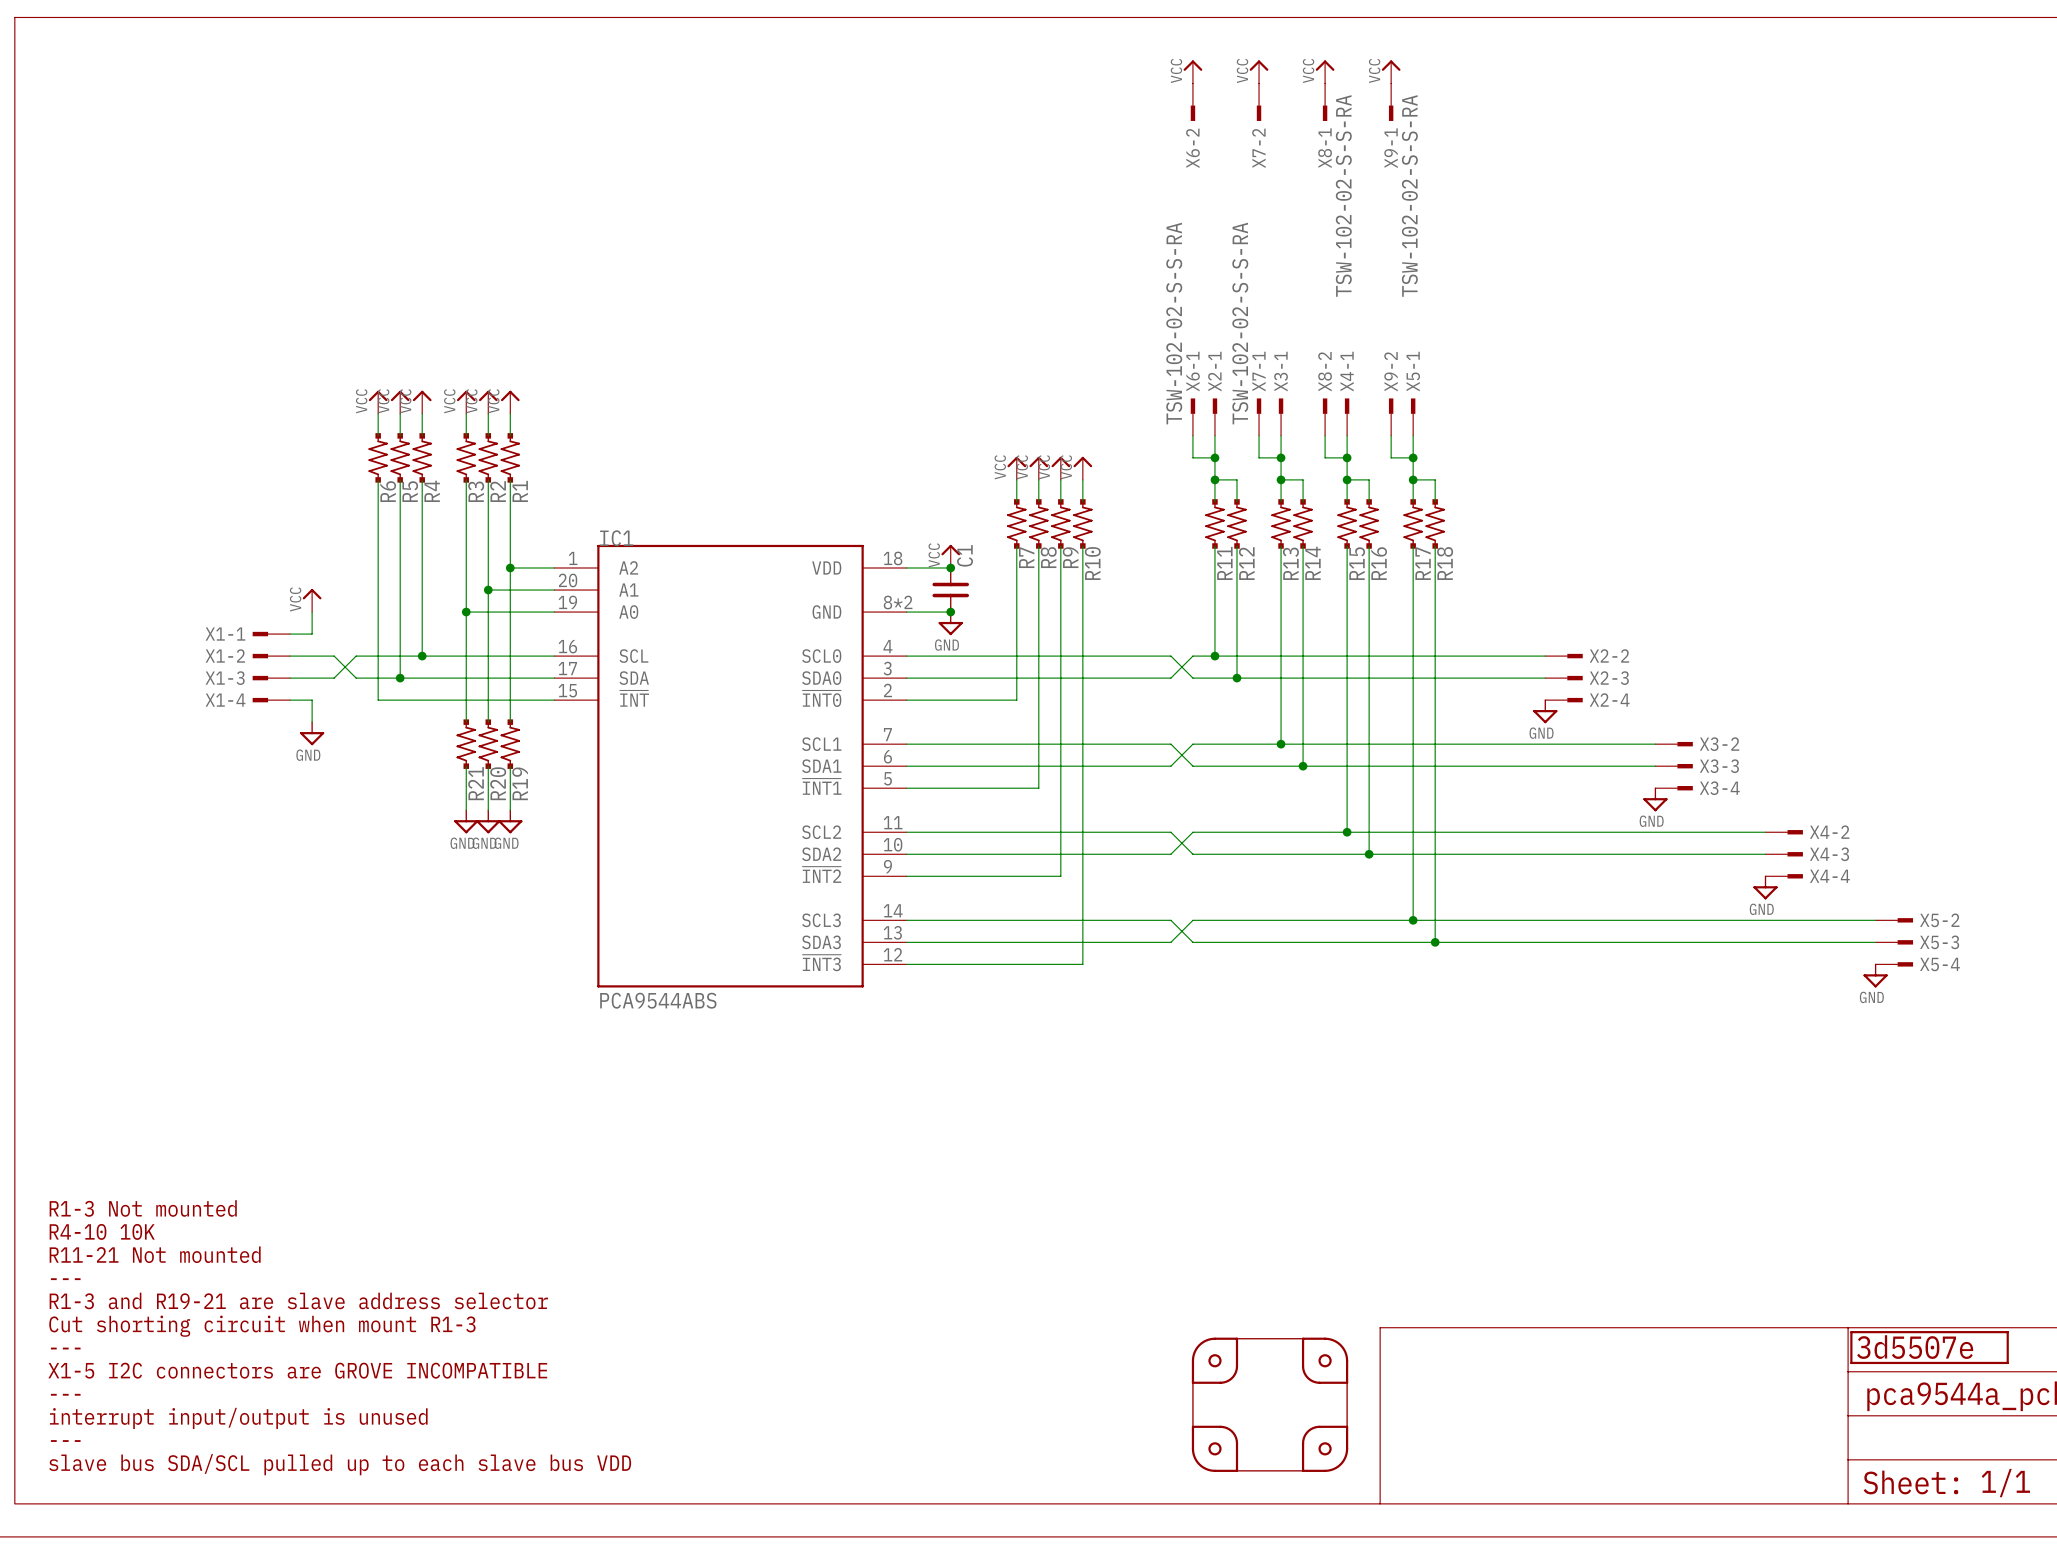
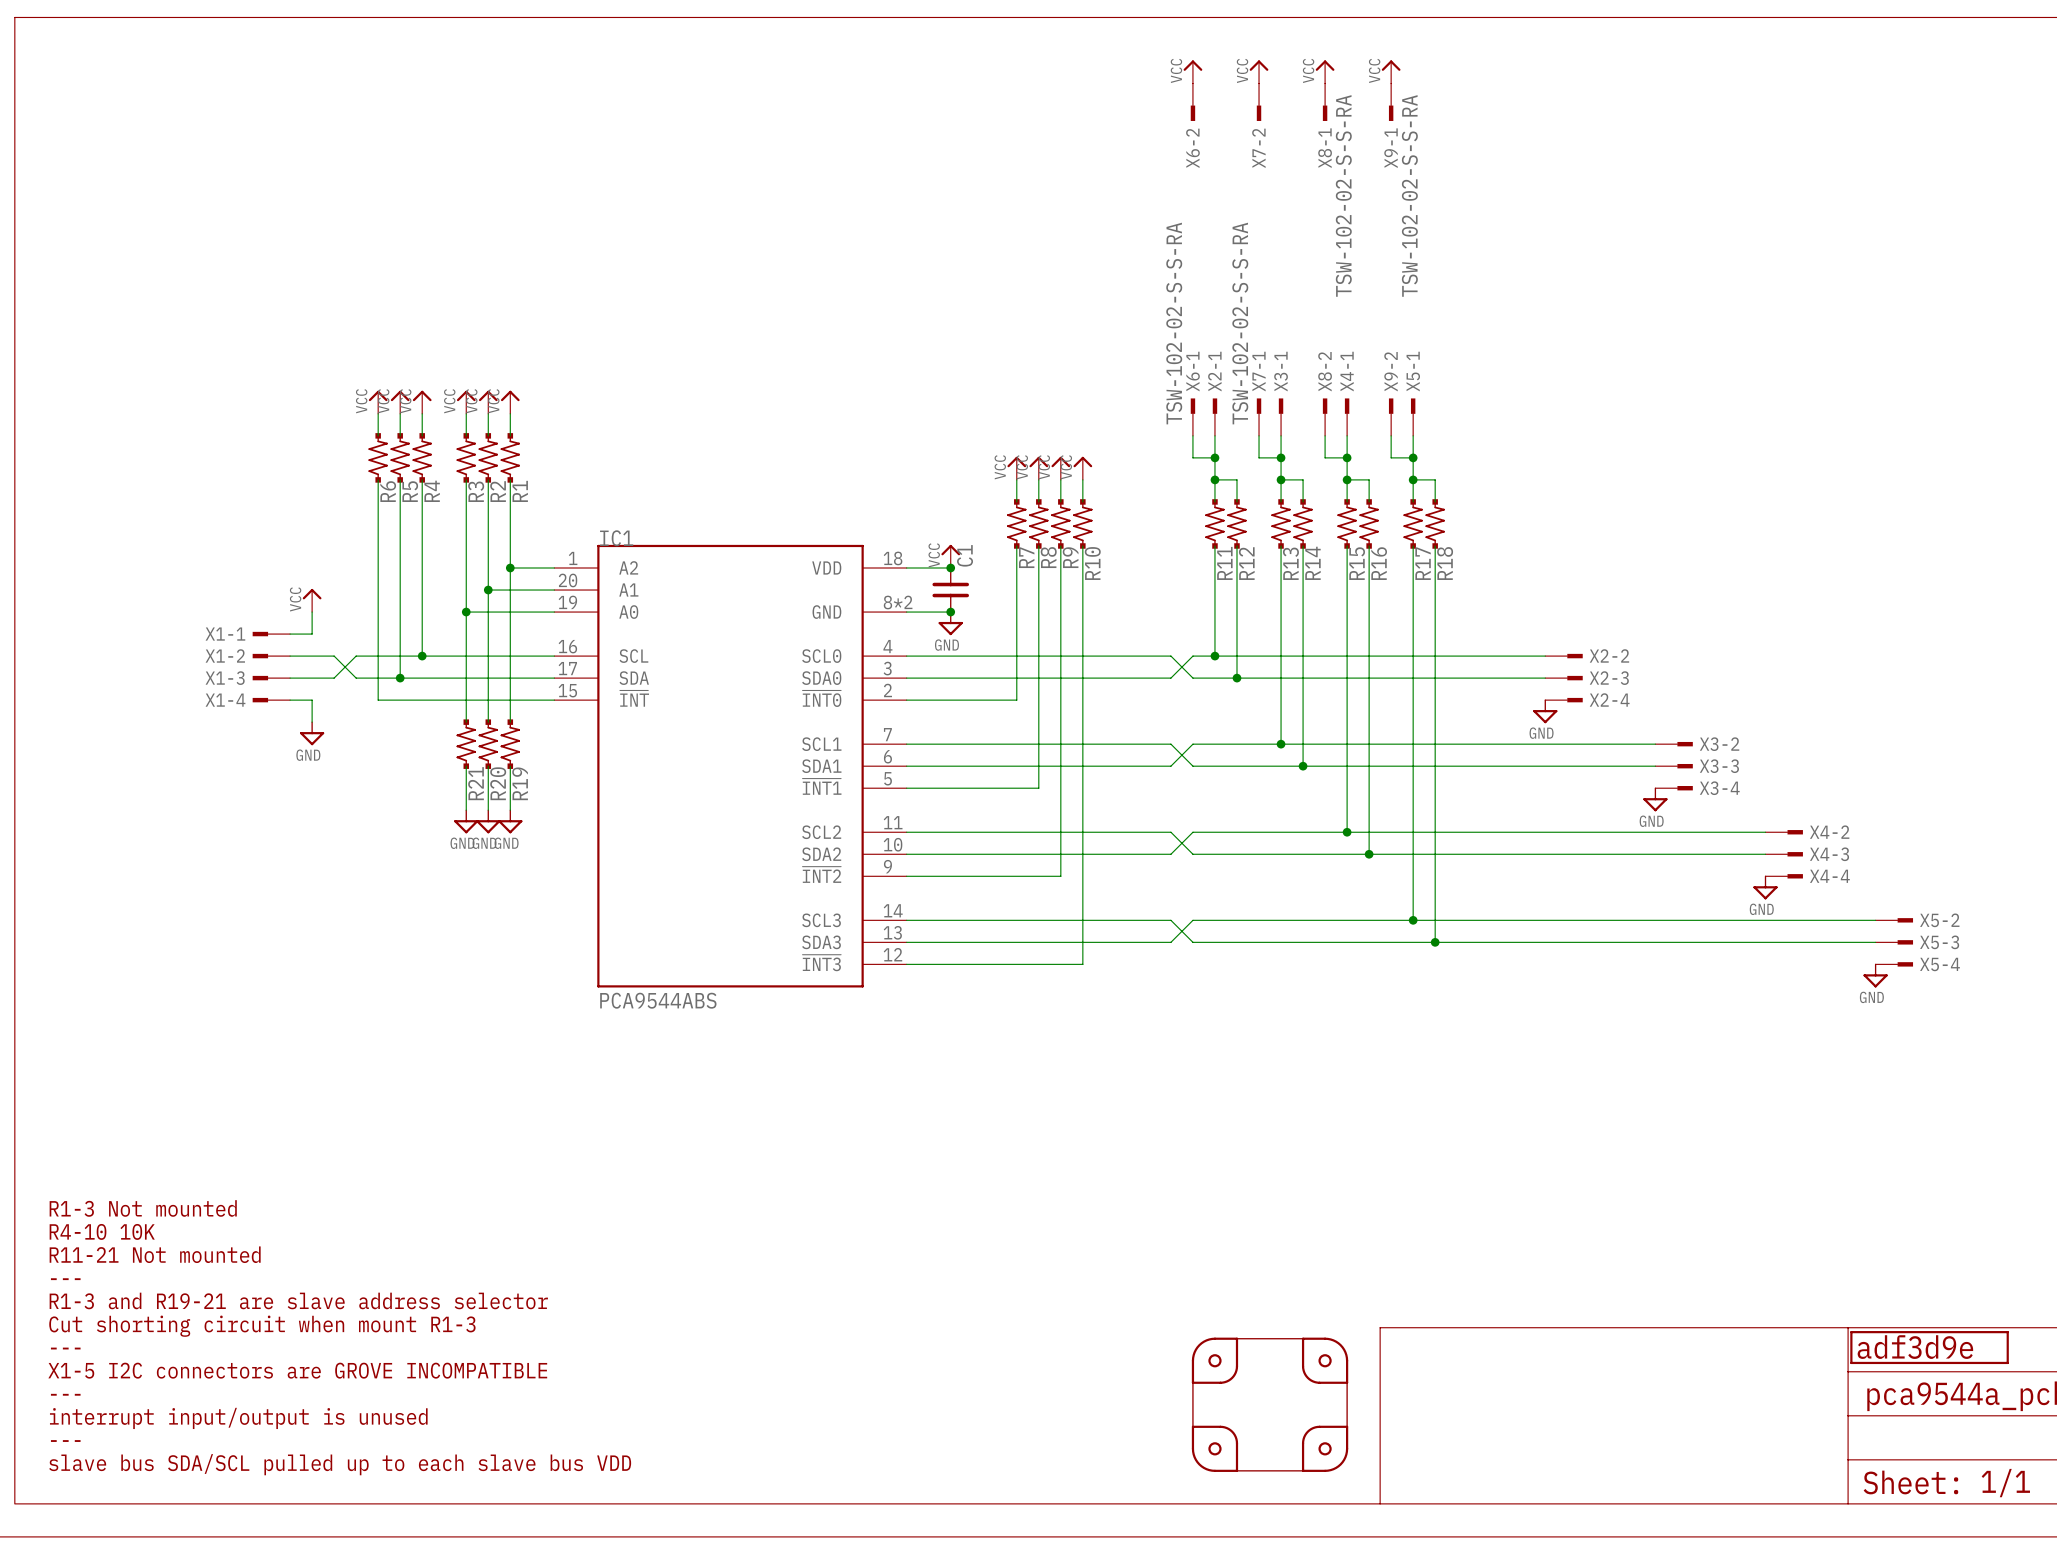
part value: 3d5507e (1915, 1347) -> adf3d9e (1915, 1347)

